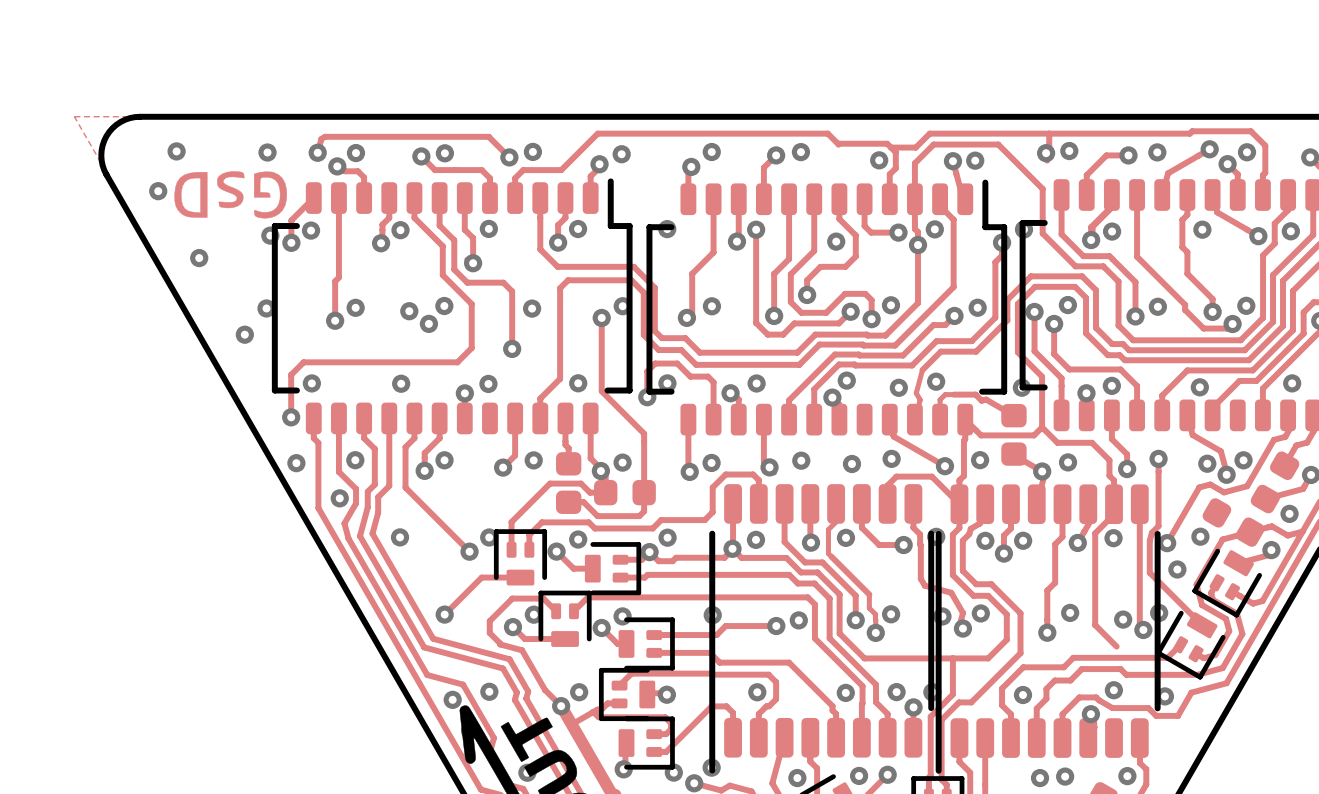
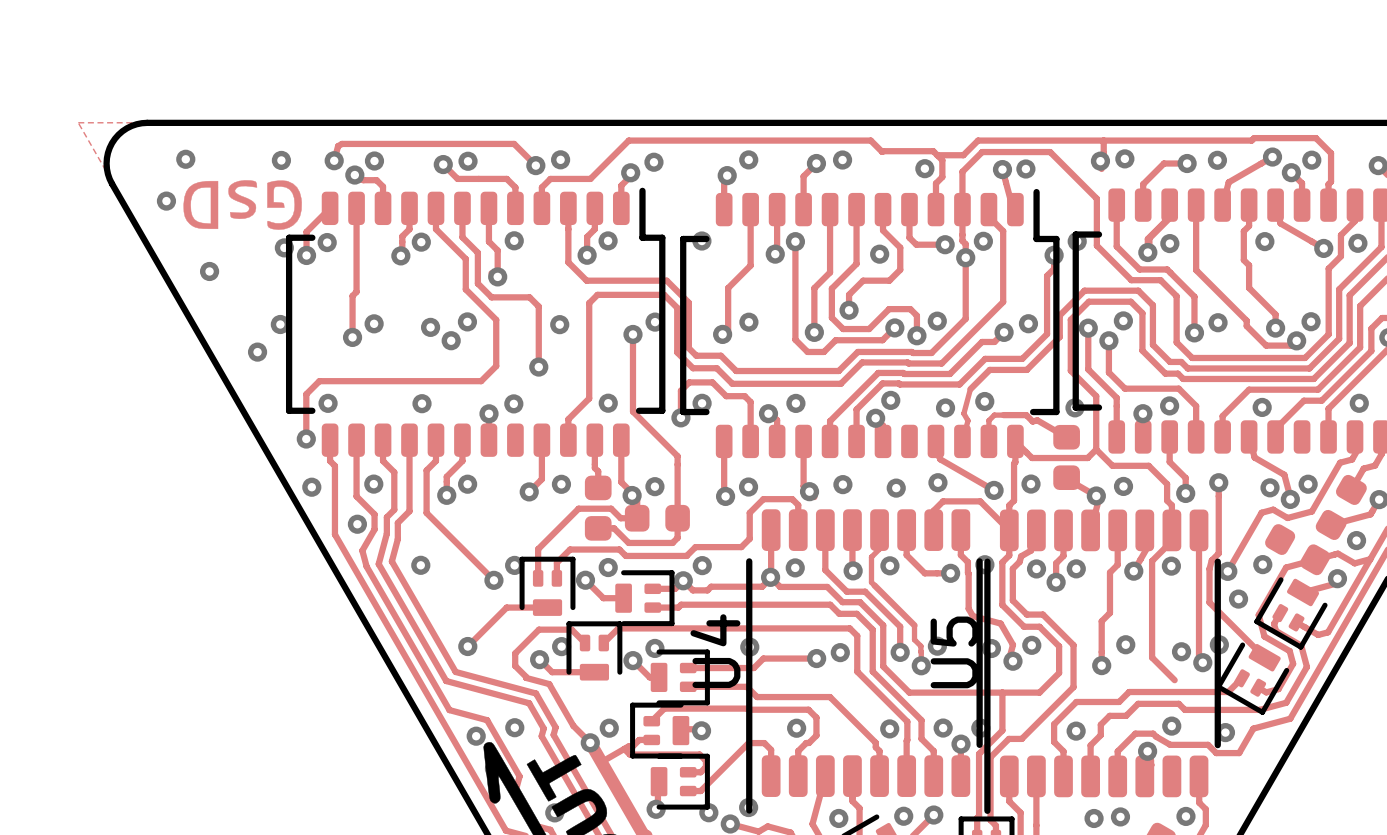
U4 name: none -> U4 (715, 651)
U5 name: none -> U5 (954, 652)

